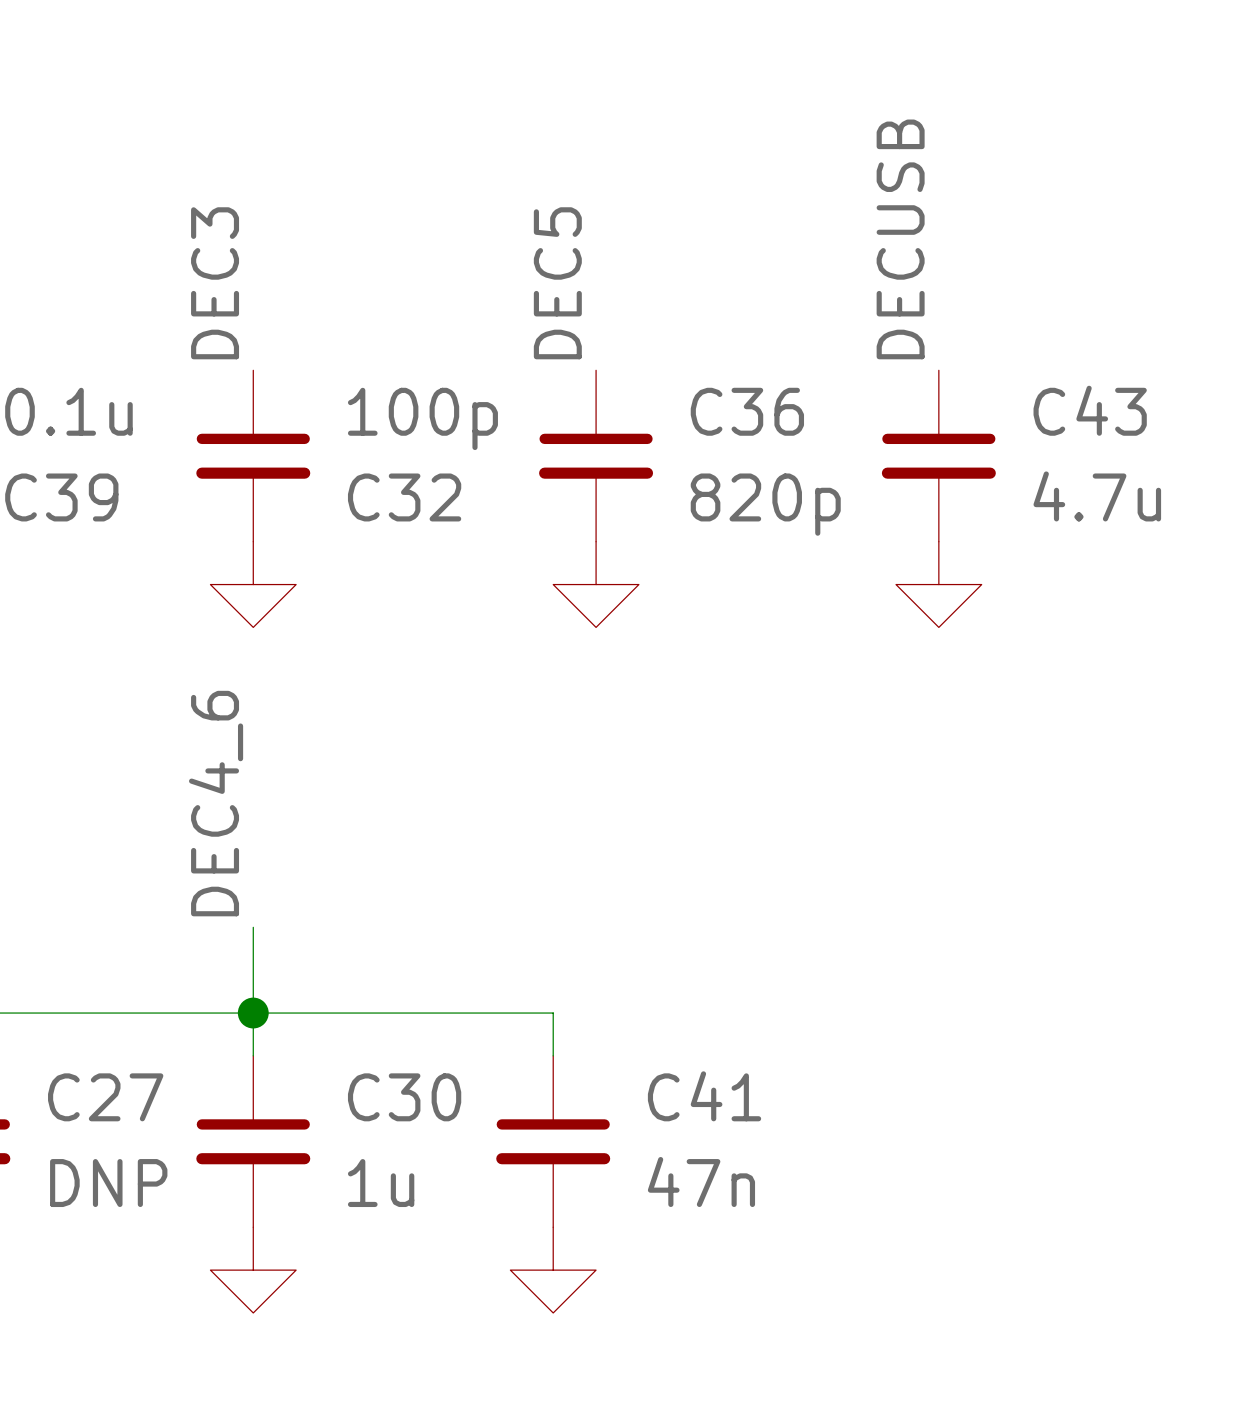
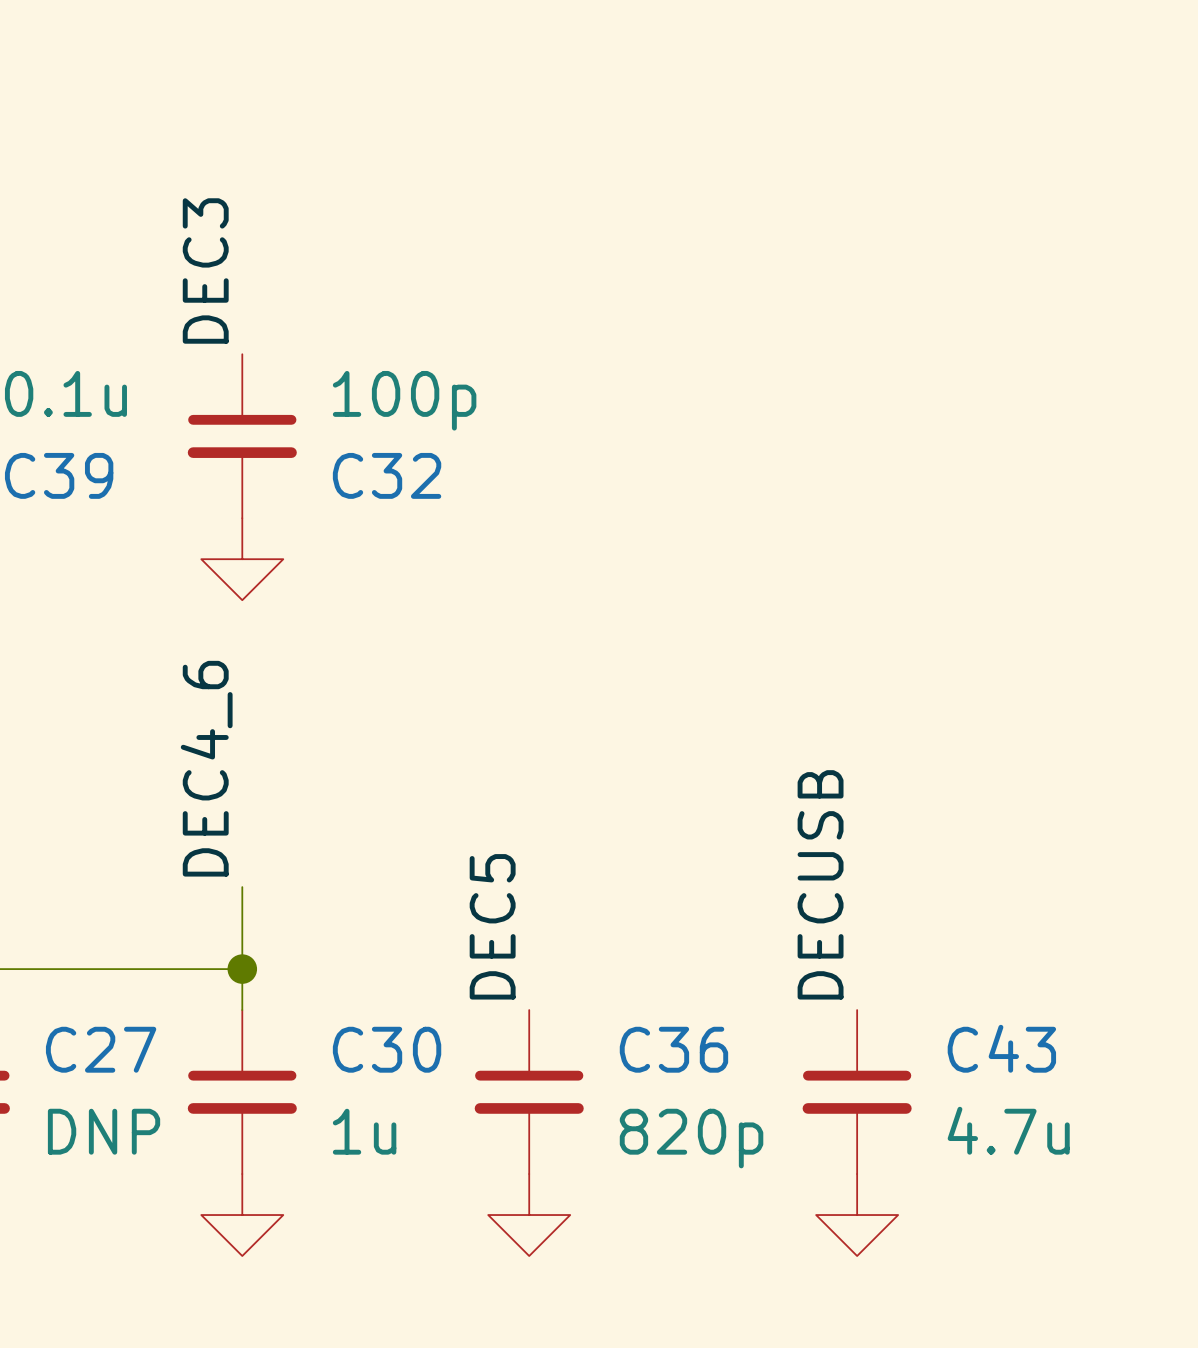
label position: DECUSB (900, 239) -> DECUSB (820, 884)
label position: DEC5 (557, 283) -> DEC5 (492, 926)
C36: 820p (596, 456) -> none
C43 position: (938, 456) -> (857, 1092)
power symbol: (596, 584) -> none
power symbol: (938, 584) -> none
wire: (253, 1013) (553, 1013) (553, 1055) -> none
C41 name: C41 (704, 1096) -> C36 (673, 1049)
C41 value: 47n (701, 1182) -> 820p (691, 1138)
power symbol: none -> (857, 1215)

